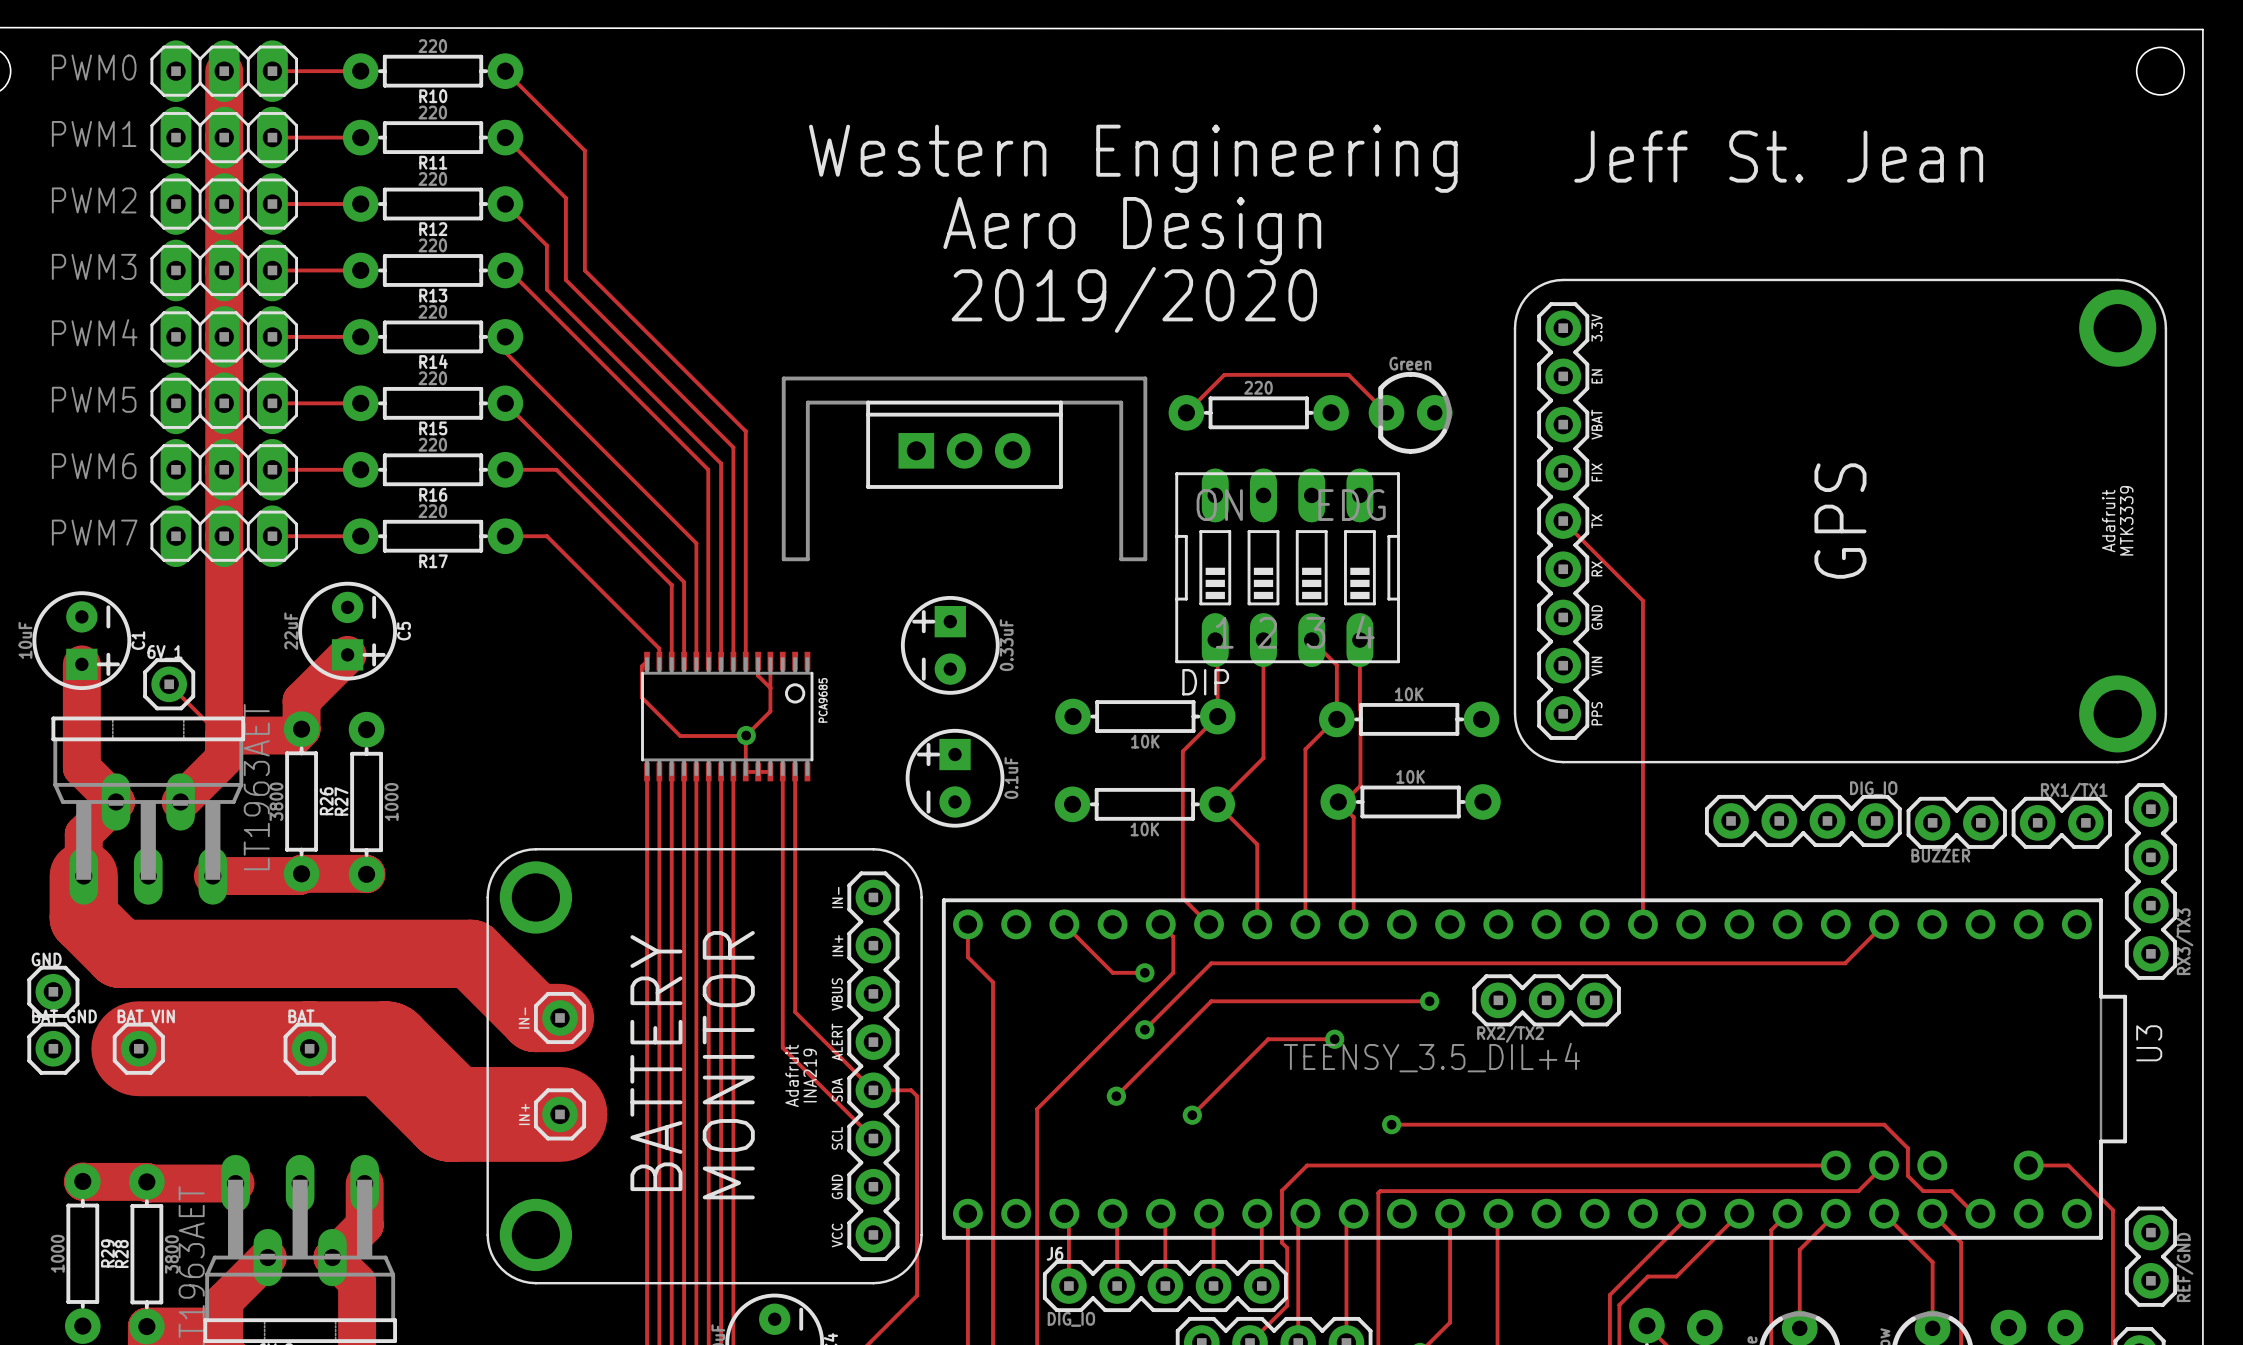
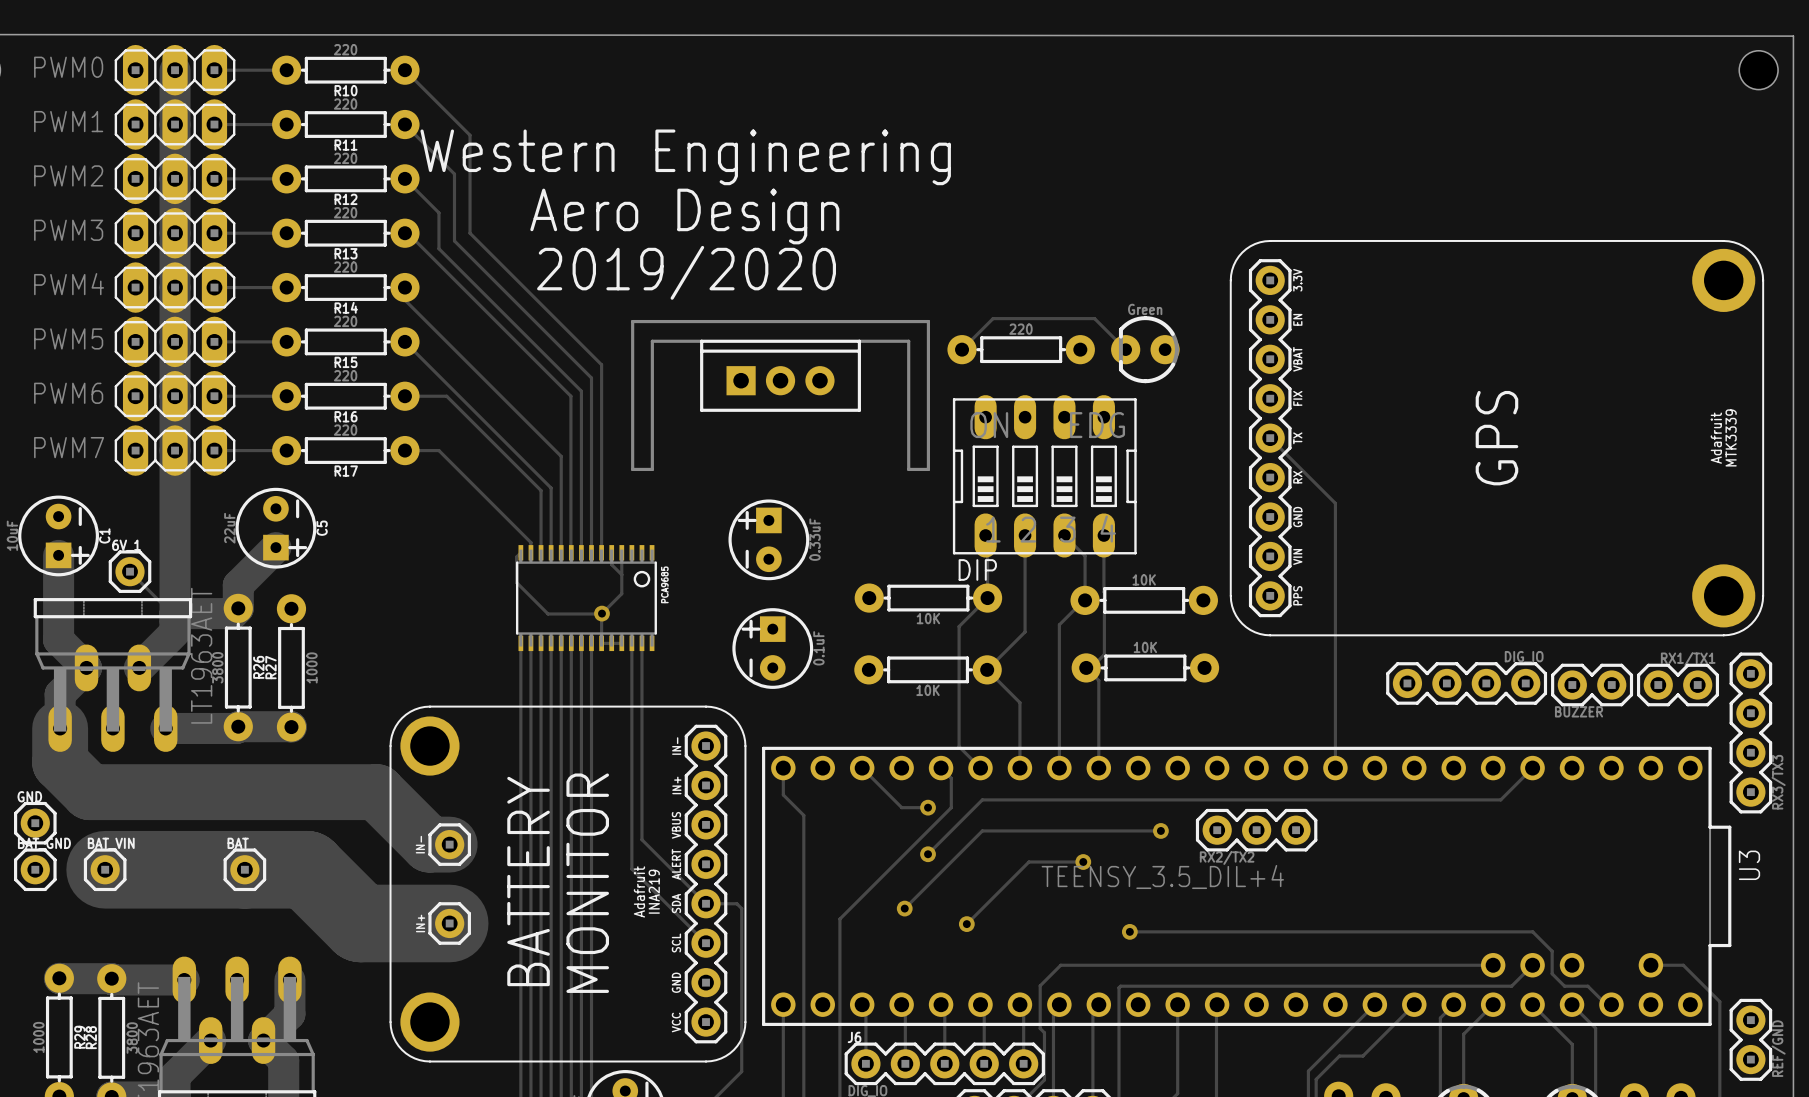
text: Jeff St. Jean (1778, 156) -> none
text position: Western Engineering (1133, 158) -> Western Engineering (685, 157)
text position: Aero Design (1132, 231) -> Aero Design (684, 216)
text position: 2019/2020 (1134, 299) -> 2019/2020 (686, 272)

